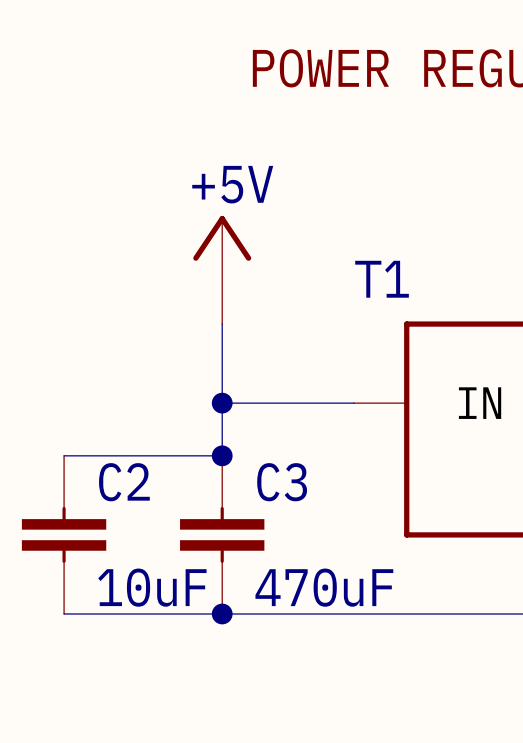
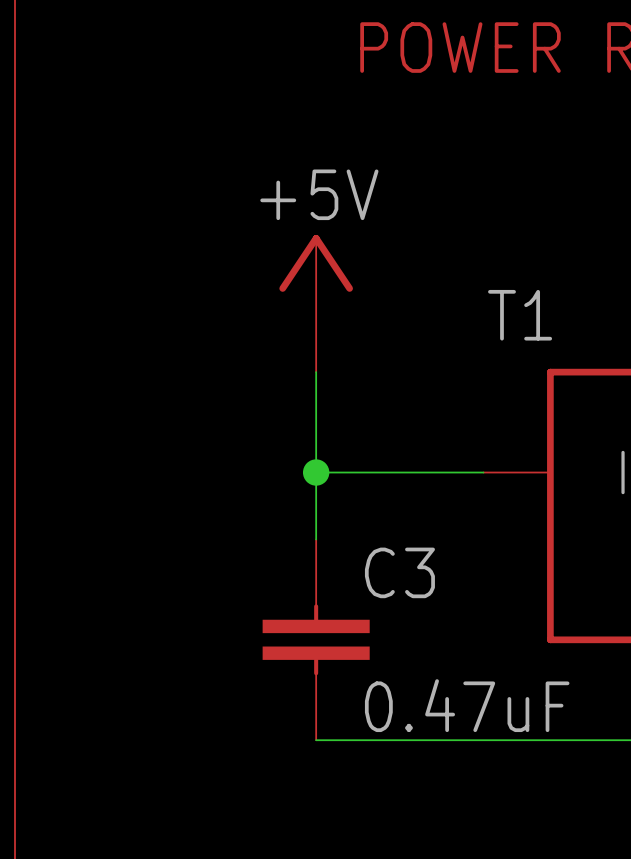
wire: (64, 455) (222, 455) -> none
junction: (222, 455) -> none
C2: 10uF (64, 534) -> none
C3 value: 470uF (324, 587) -> 0.47uF (467, 705)
wire: (64, 613) (222, 613) -> none
junction: (222, 613) -> none

